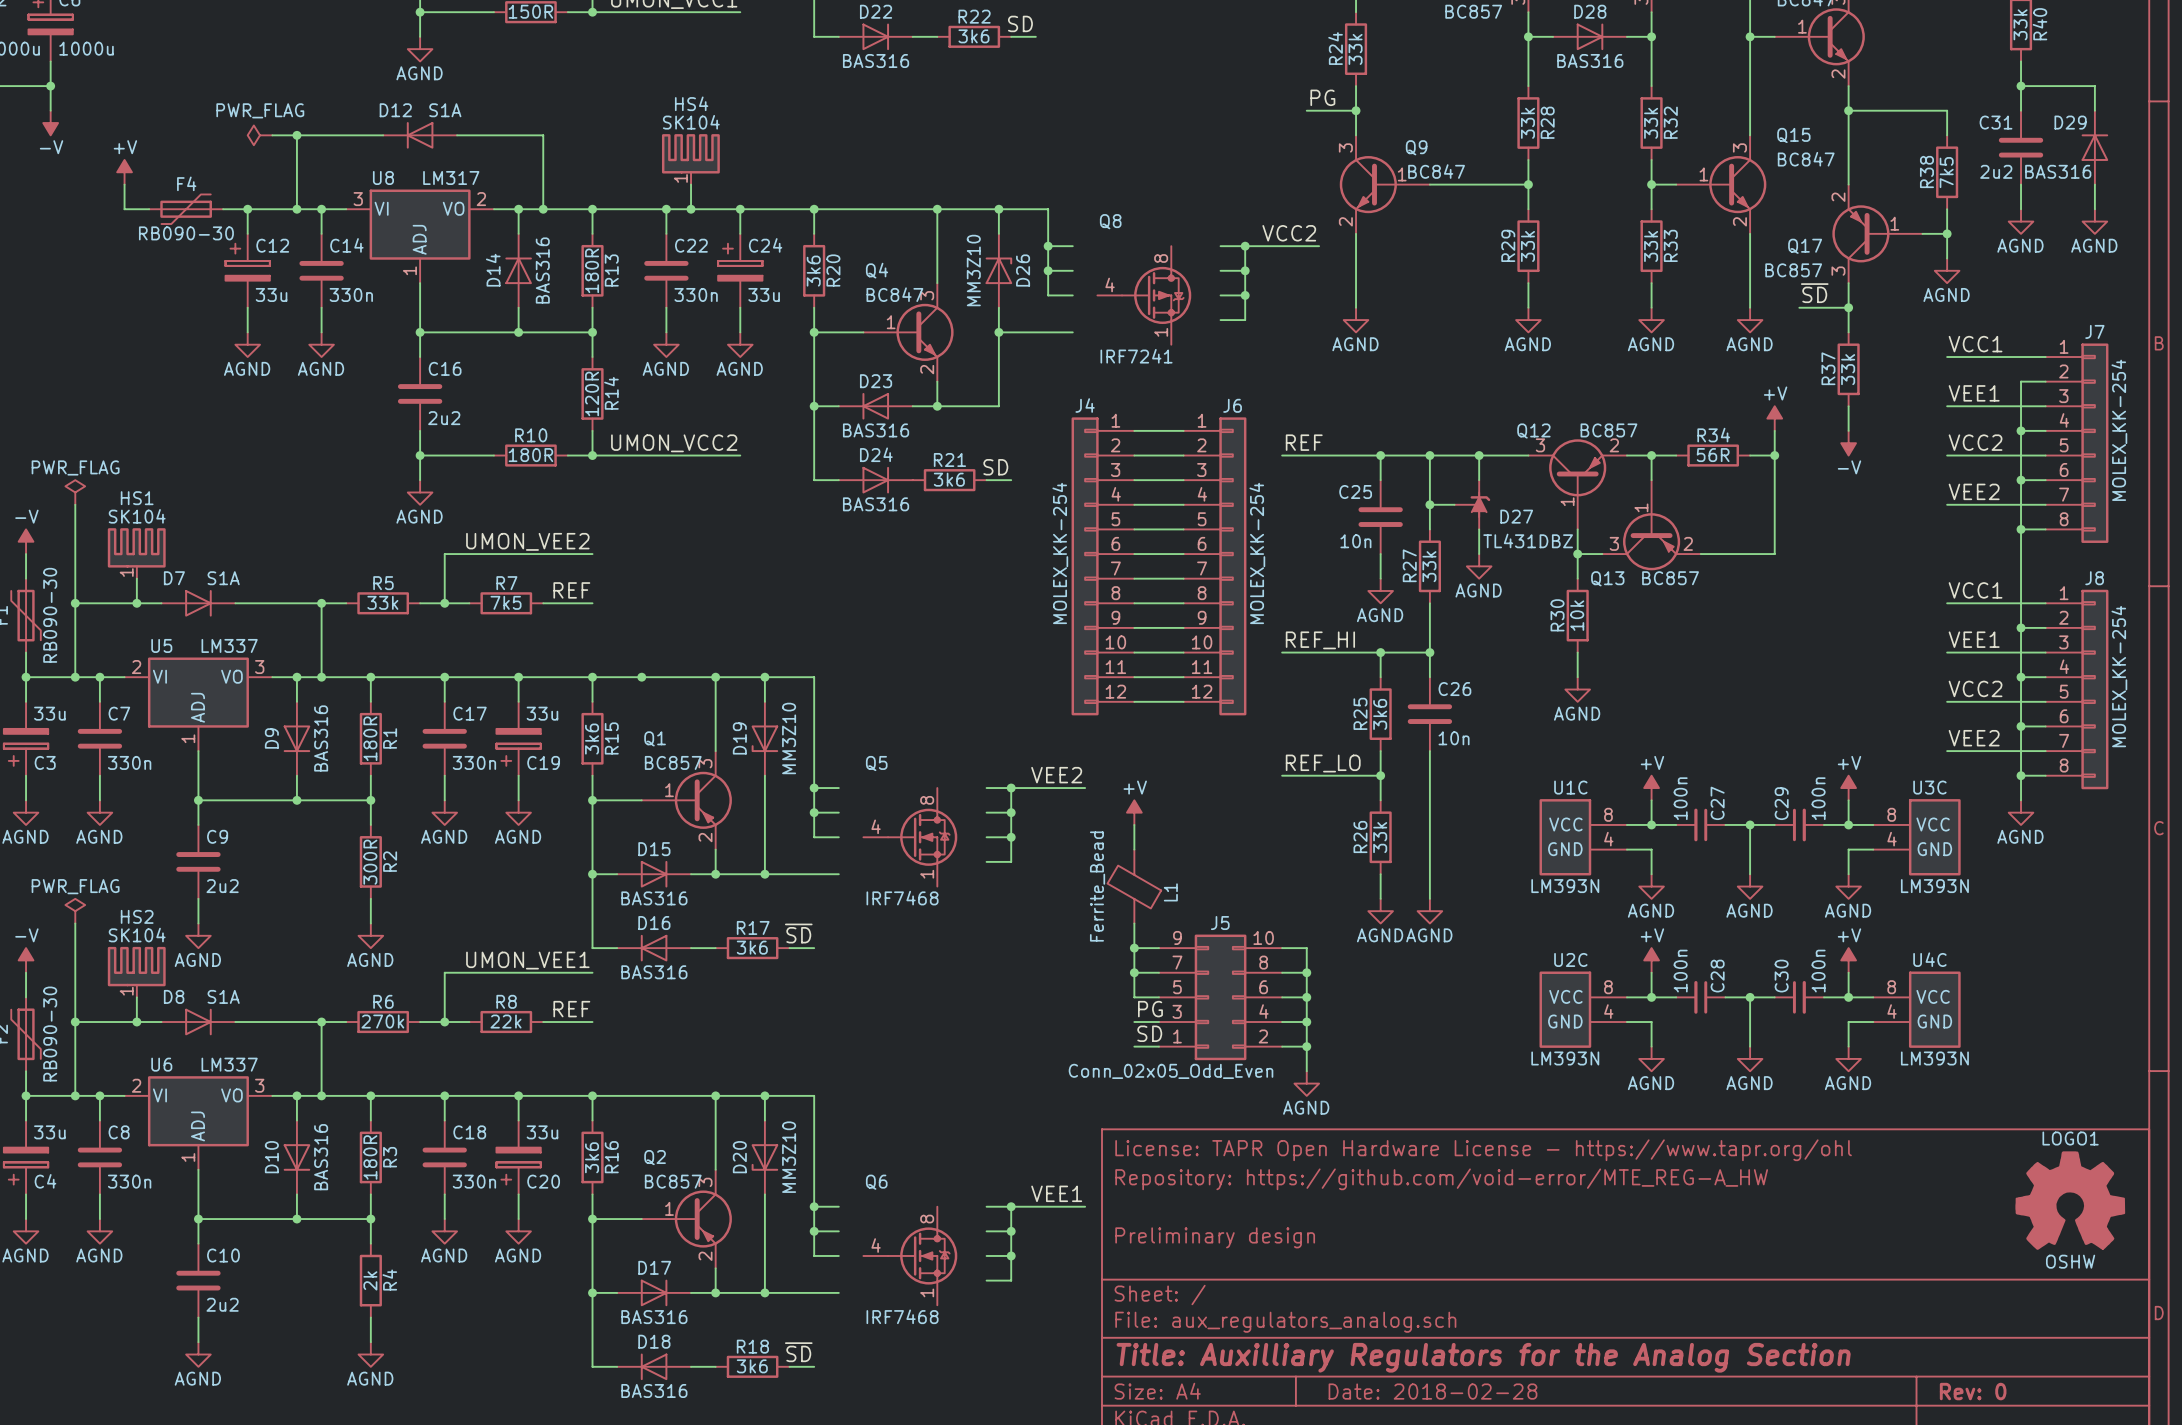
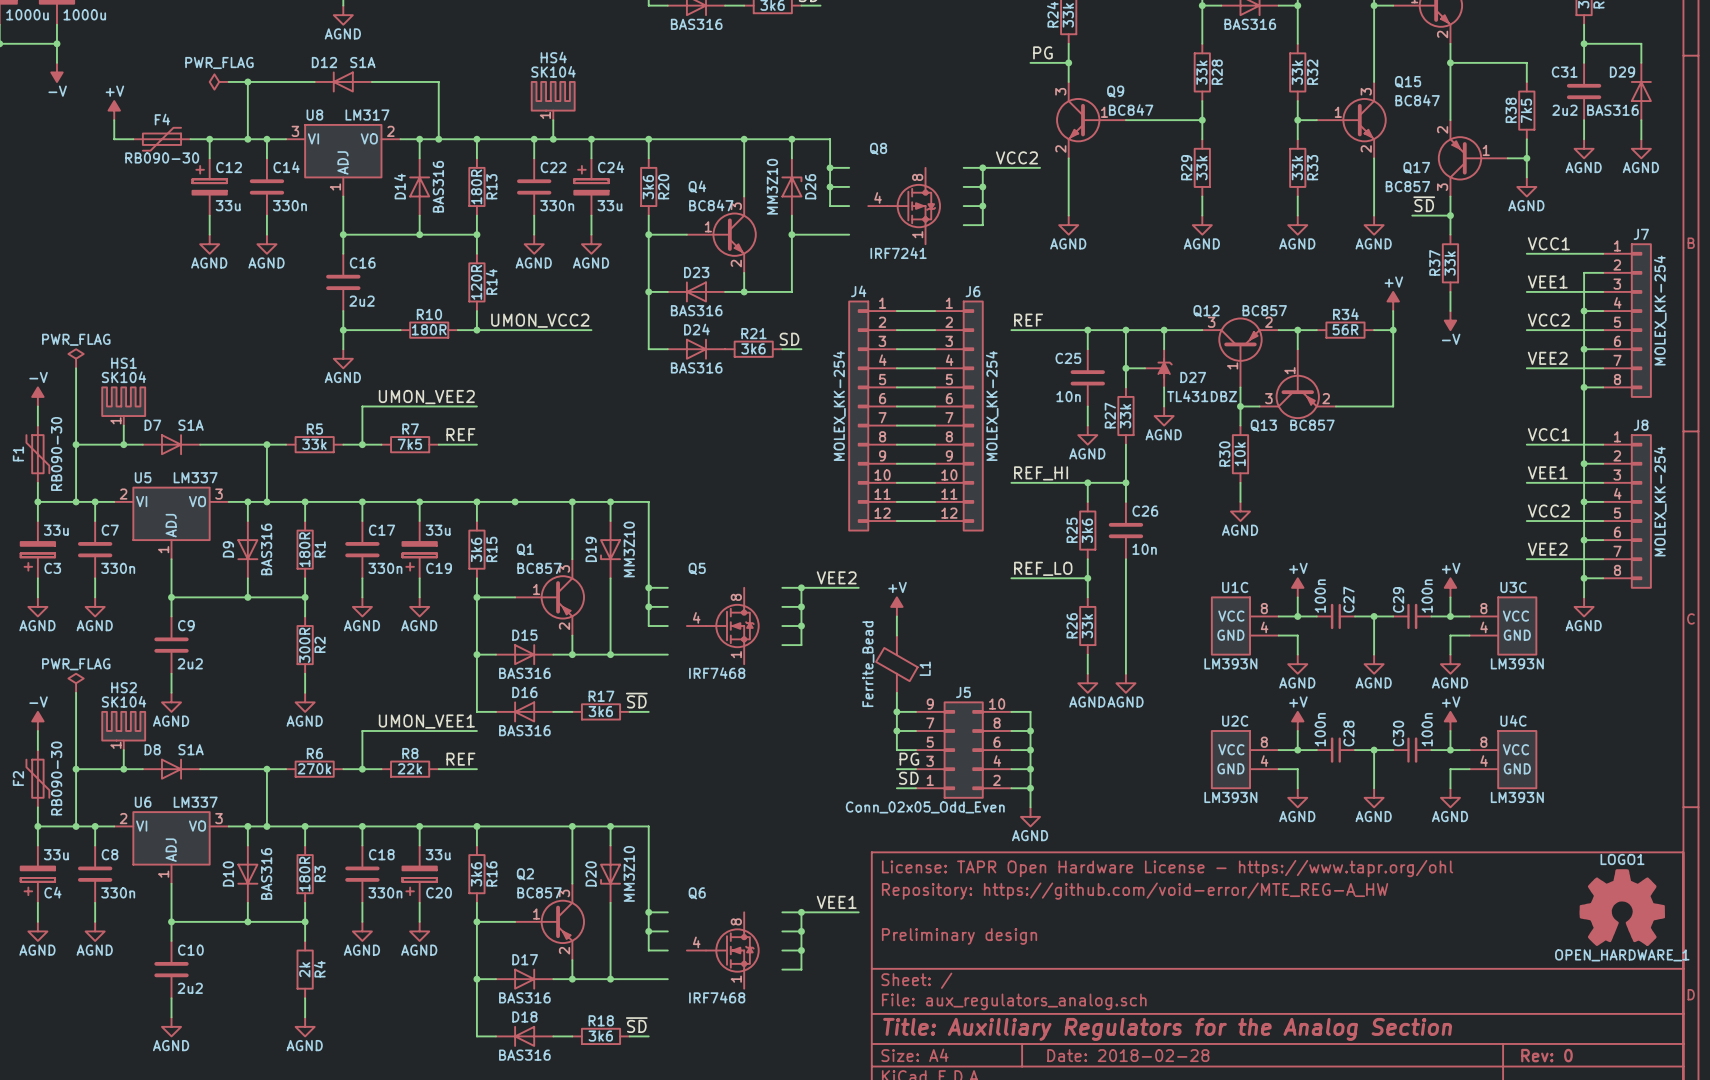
LOGO1 value: OSHW (2070, 1261) -> OPEN_HARDWARE_1 (1622, 955)

